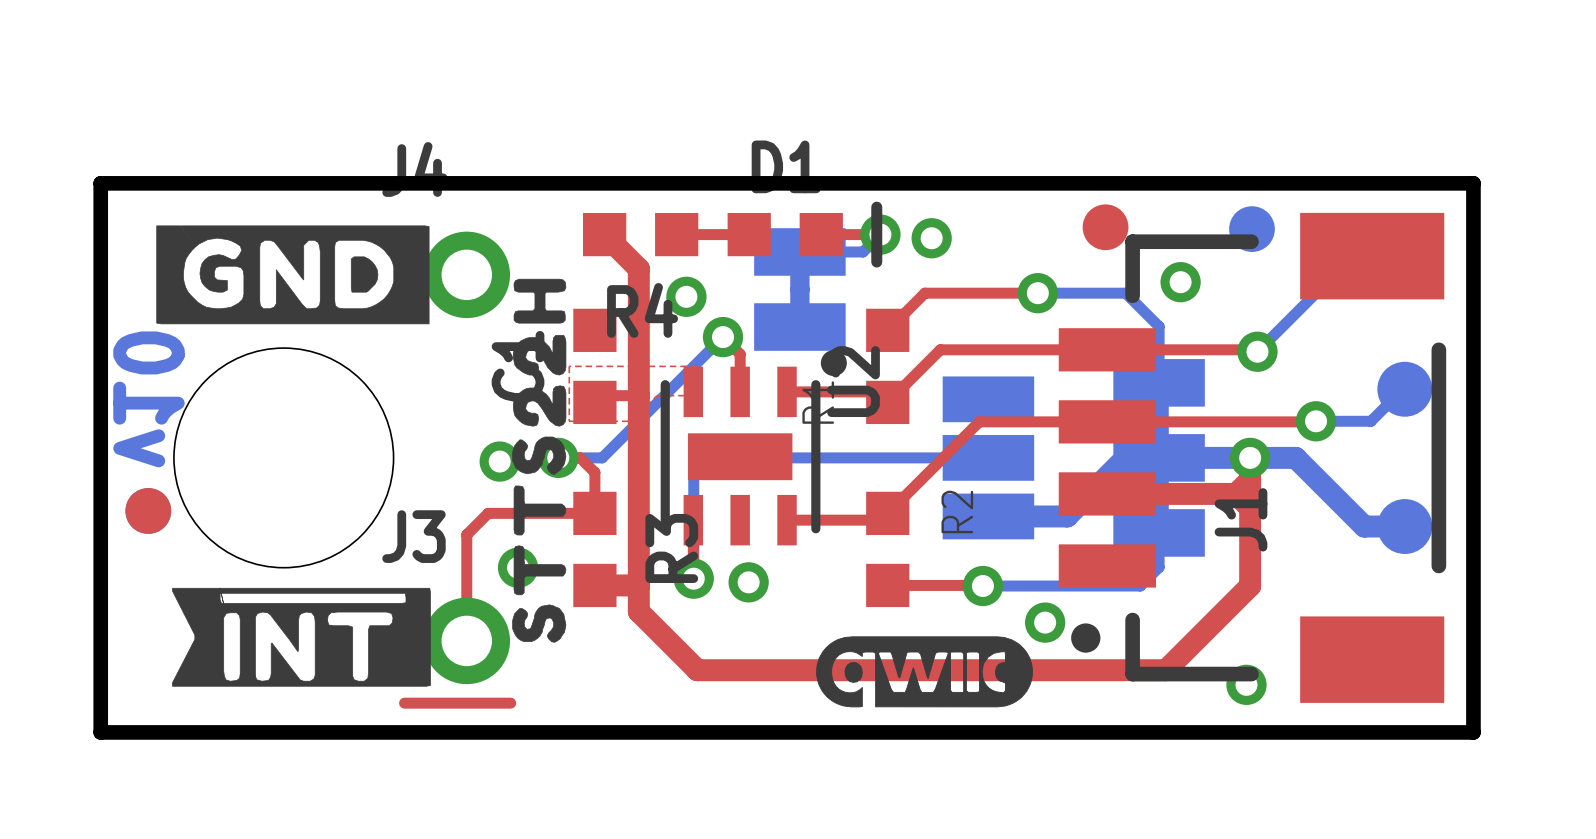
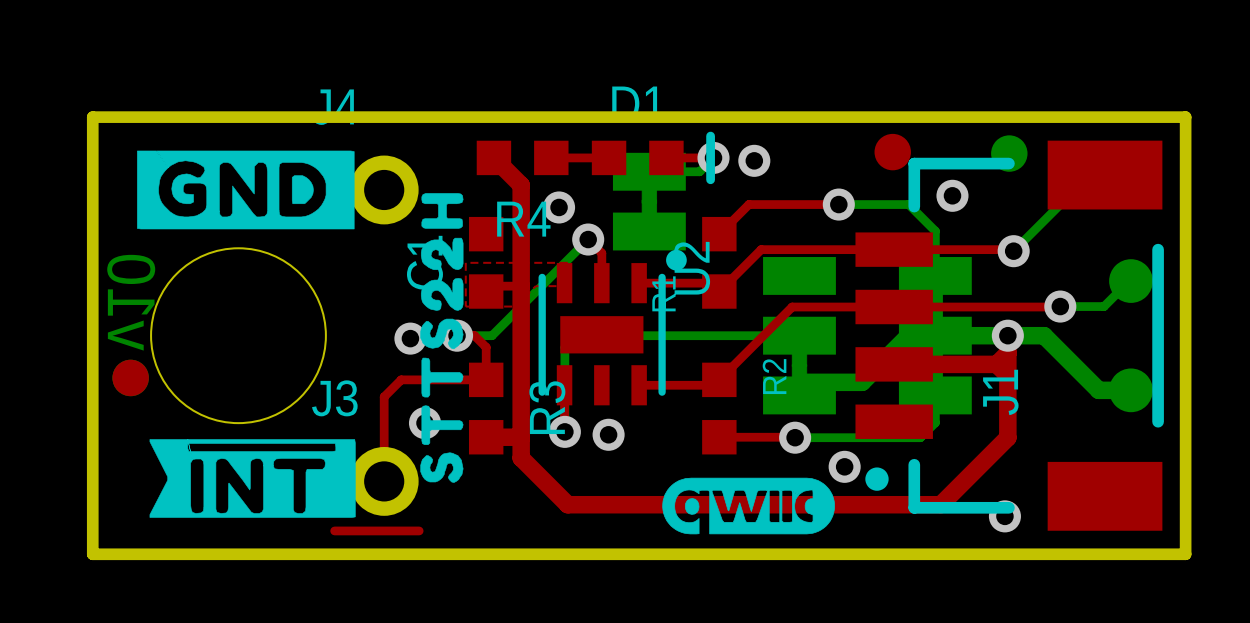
part footprint: [942, 376, 1035, 540] -> [763, 257, 836, 415]

